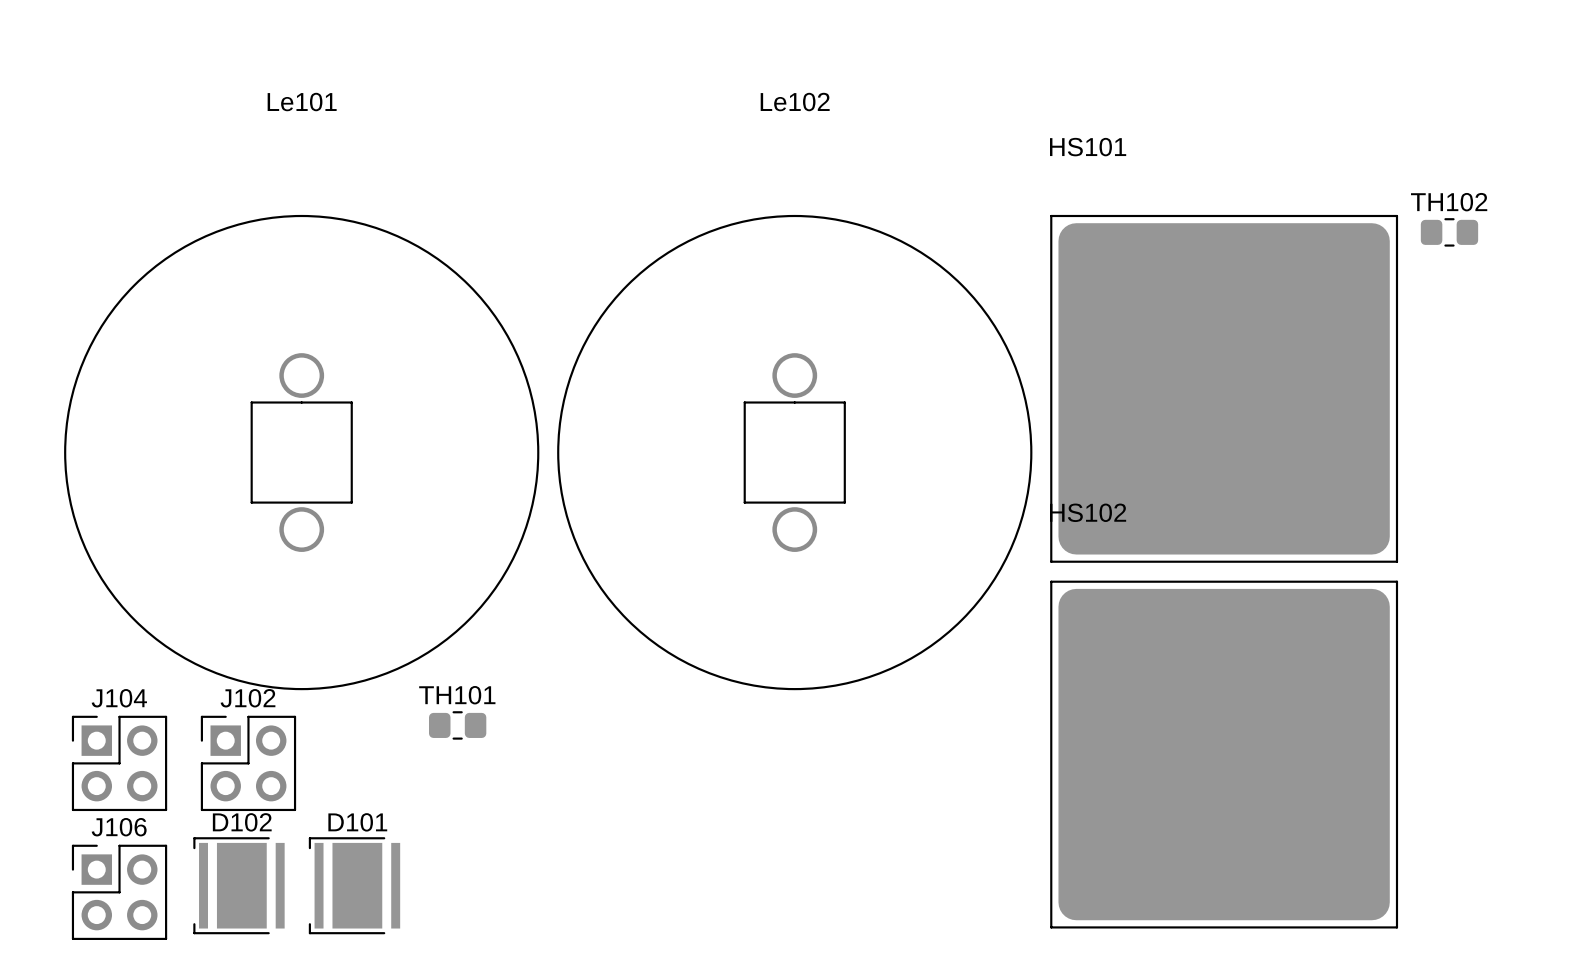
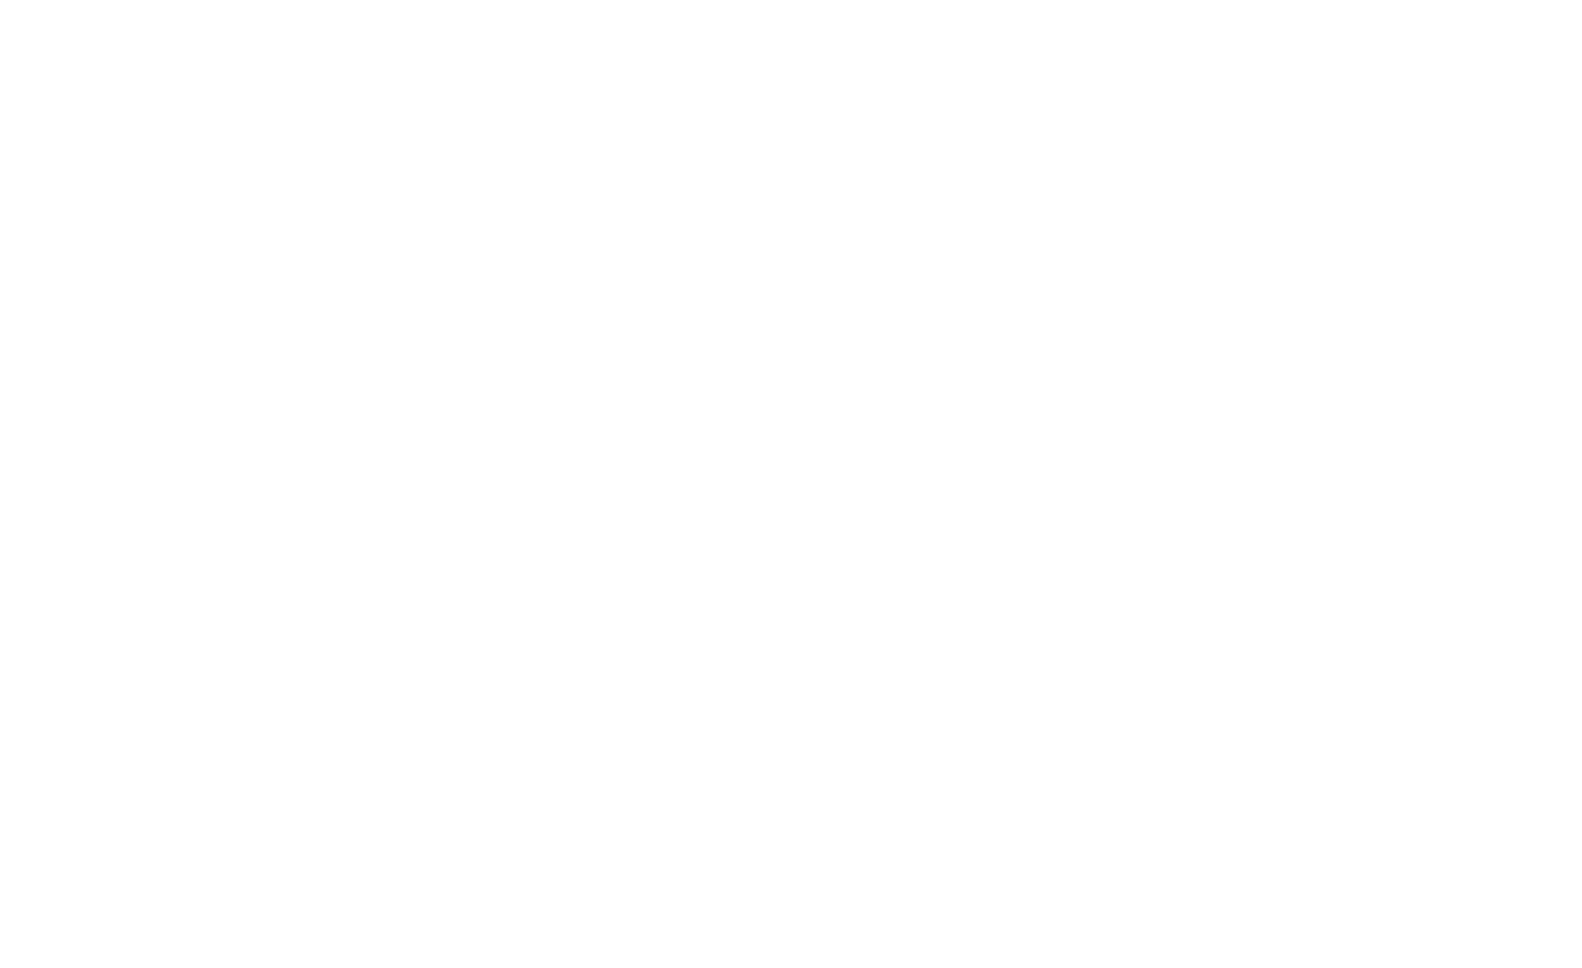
TH102: (1449, 232) -> none
HS101: (1224, 388) -> none
Le101: (301, 452) -> none
Le102: (794, 452) -> none
TH101: (457, 725) -> none
HS102: (1224, 754) -> none
J104: (119, 763) -> none
J102: (248, 763) -> none
D102: (238, 885) -> none
D101: (354, 885) -> none
J106: (119, 892) -> none

